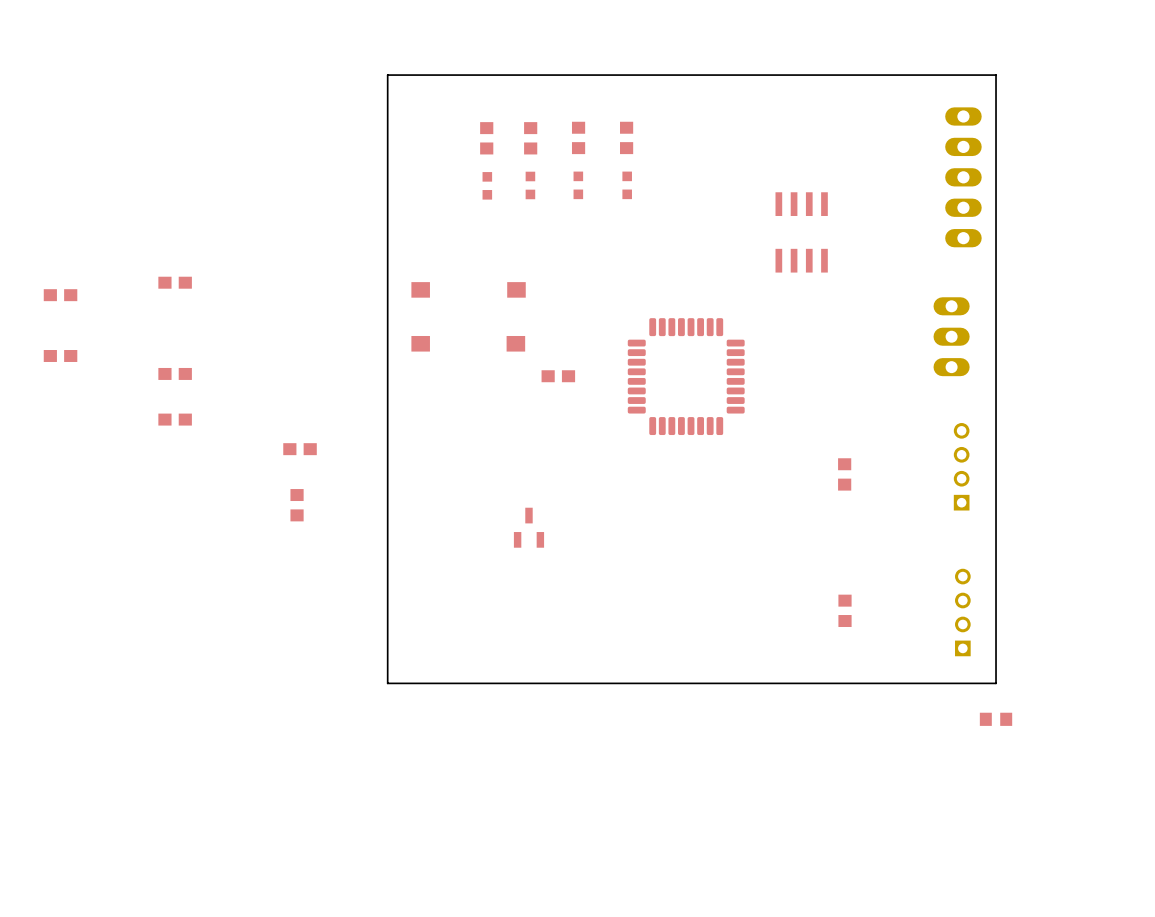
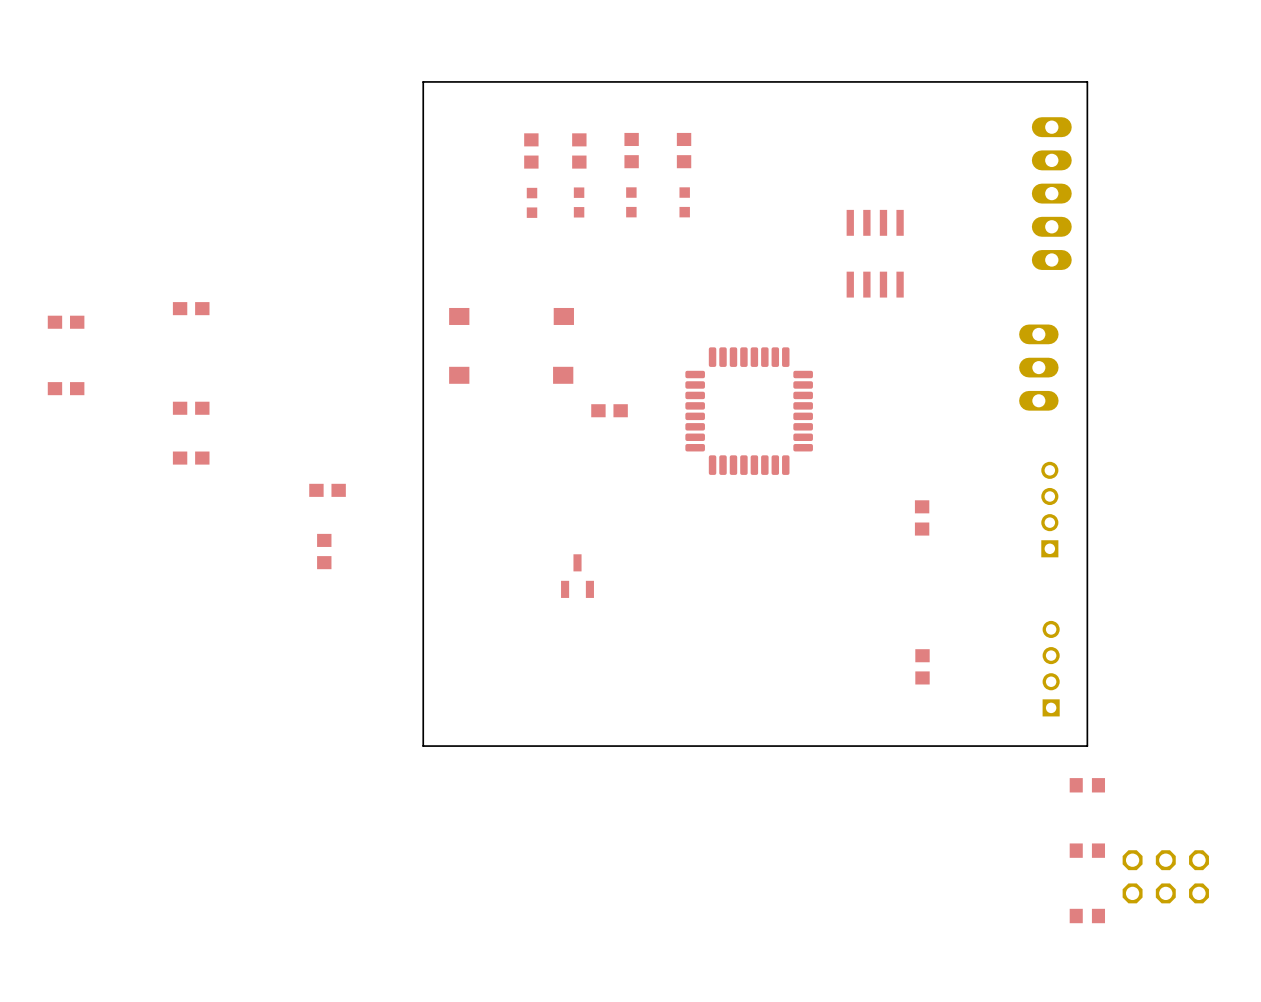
part: none -> (1087, 850)
part: none -> (1165, 876)
part: none -> (1087, 916)

